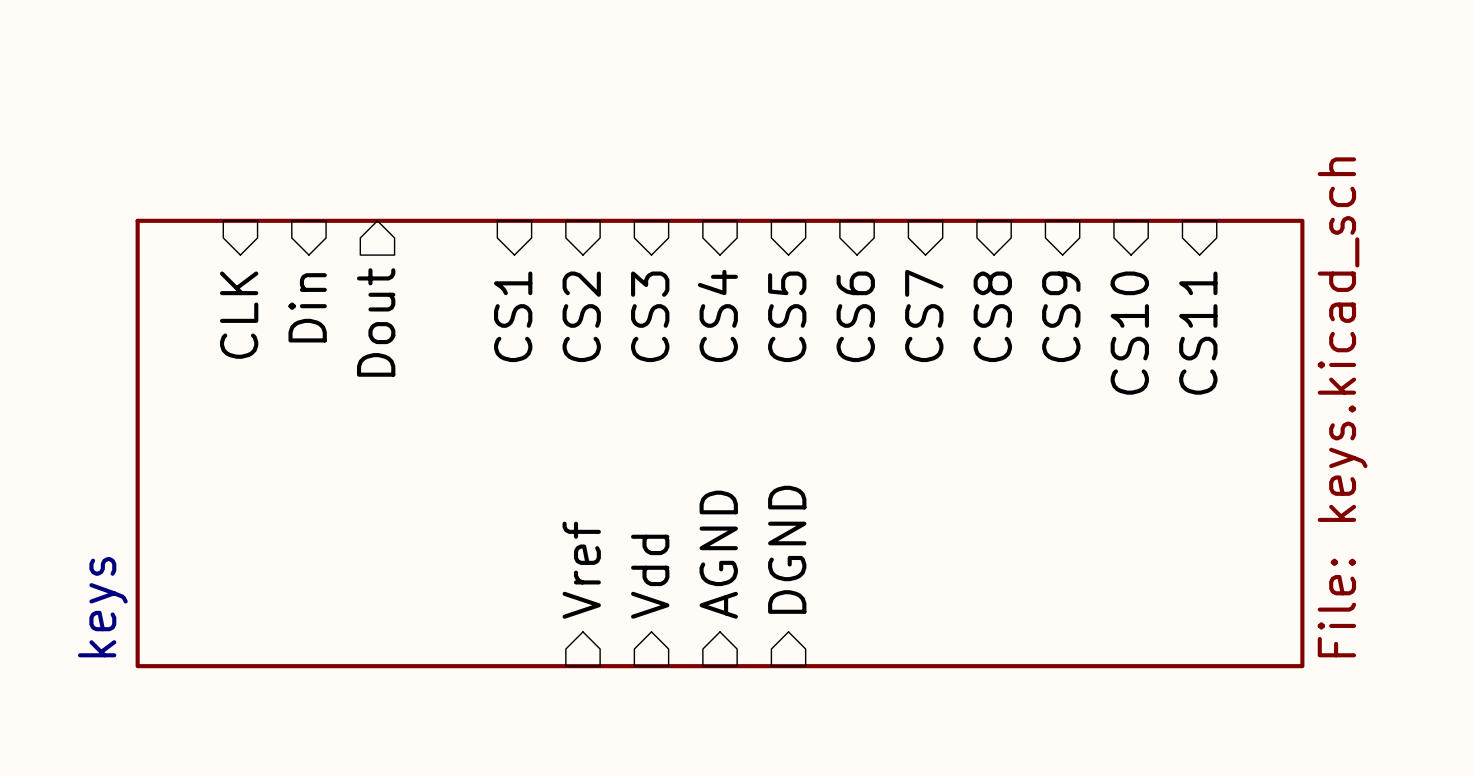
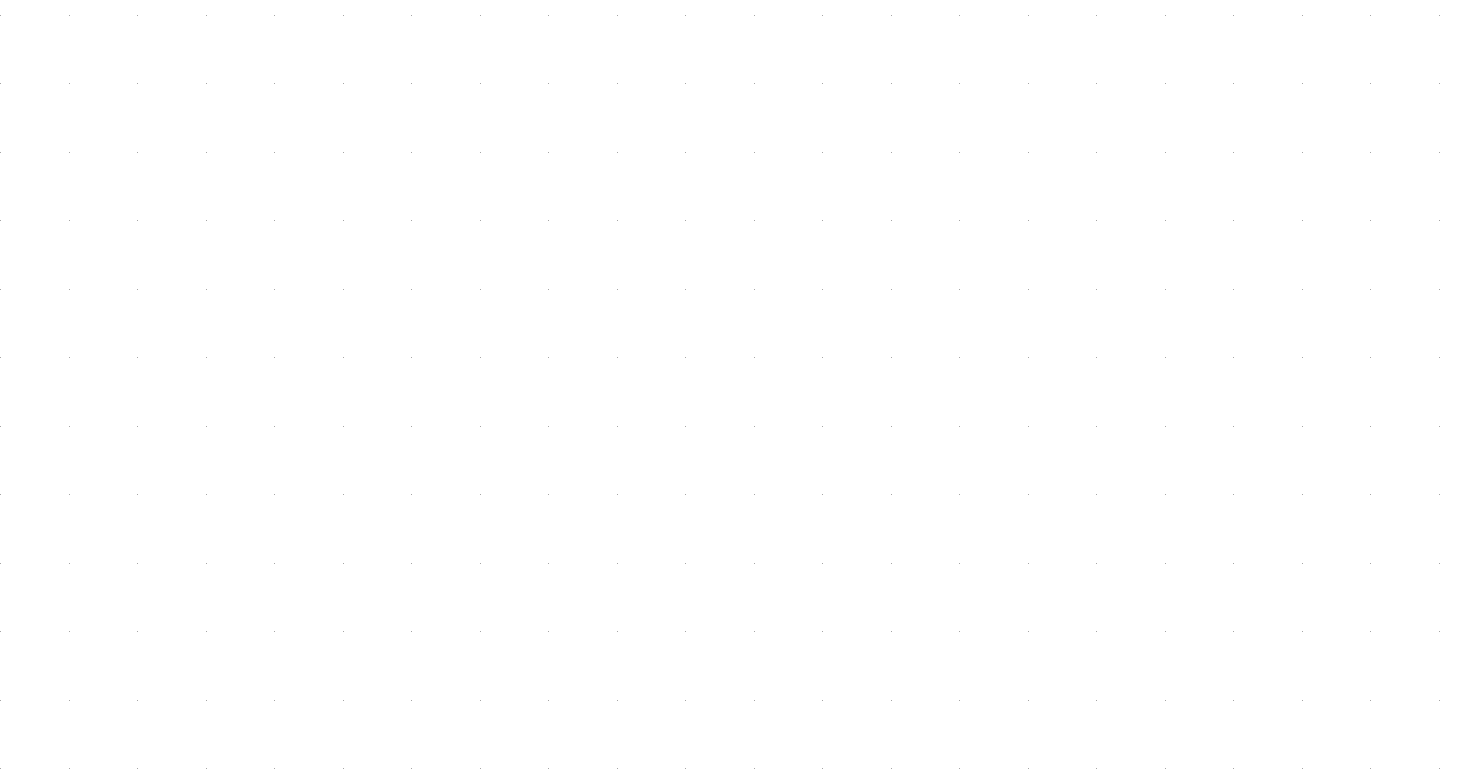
sheet pin: Din (307, 307) -> none
sheet pin: CLK (239, 315) -> none
sheet pin: CS4 (717, 315) -> none
sheet pin: CS7 (924, 315) -> none
sheet pin: CS1 (513, 316) -> none
sheet pin: CS2 (581, 316) -> none
sheet pin: CS3 (650, 316) -> none
sheet pin: CS5 (787, 316) -> none
sheet pin: CS6 (855, 316) -> none
sheet pin: CS8 (992, 316) -> none
sheet pin: CS9 (1061, 316) -> none
sheet pin: Dout (376, 322) -> none
sheet pin: CS10 (1129, 333) -> none
sheet pin: CS11 (1198, 333) -> none
sheet keys: File: keys.kicad_sch (720, 443) -> none
sheet pin: DGND (787, 549) -> none
sheet pin: AGND (718, 554) -> none
sheet pin: Vref (581, 570) -> none
sheet pin: Vdd (650, 576) -> none

